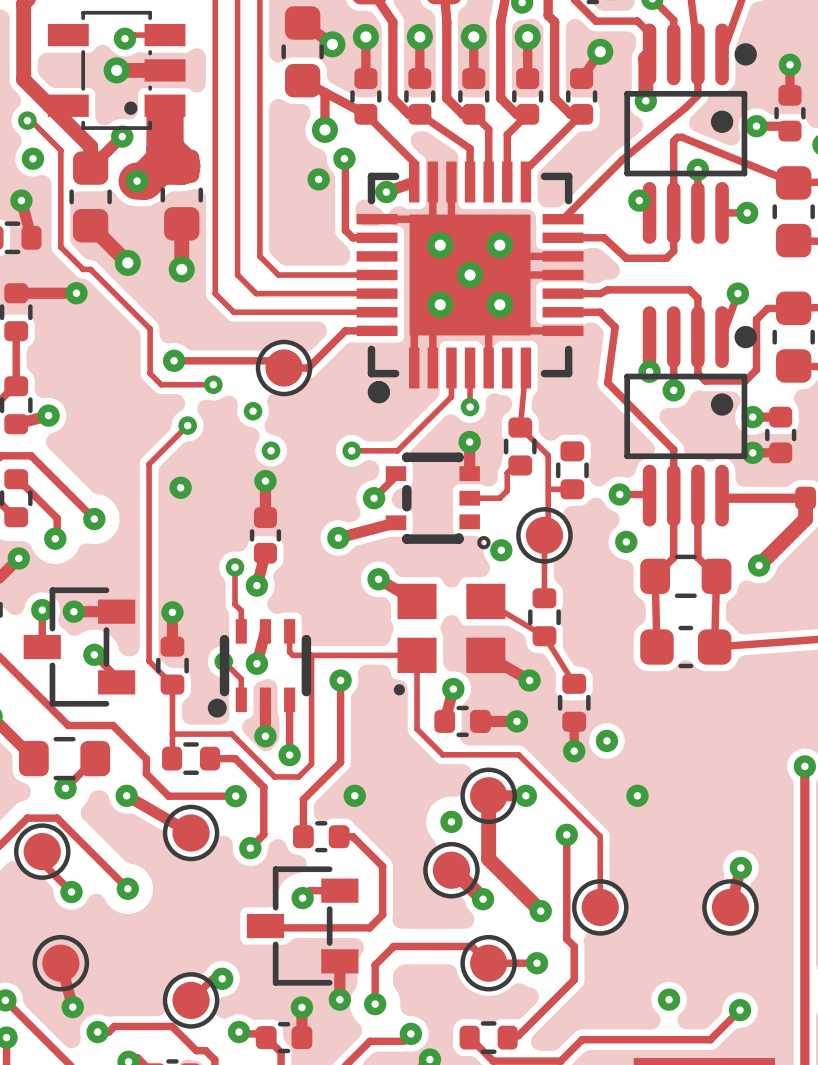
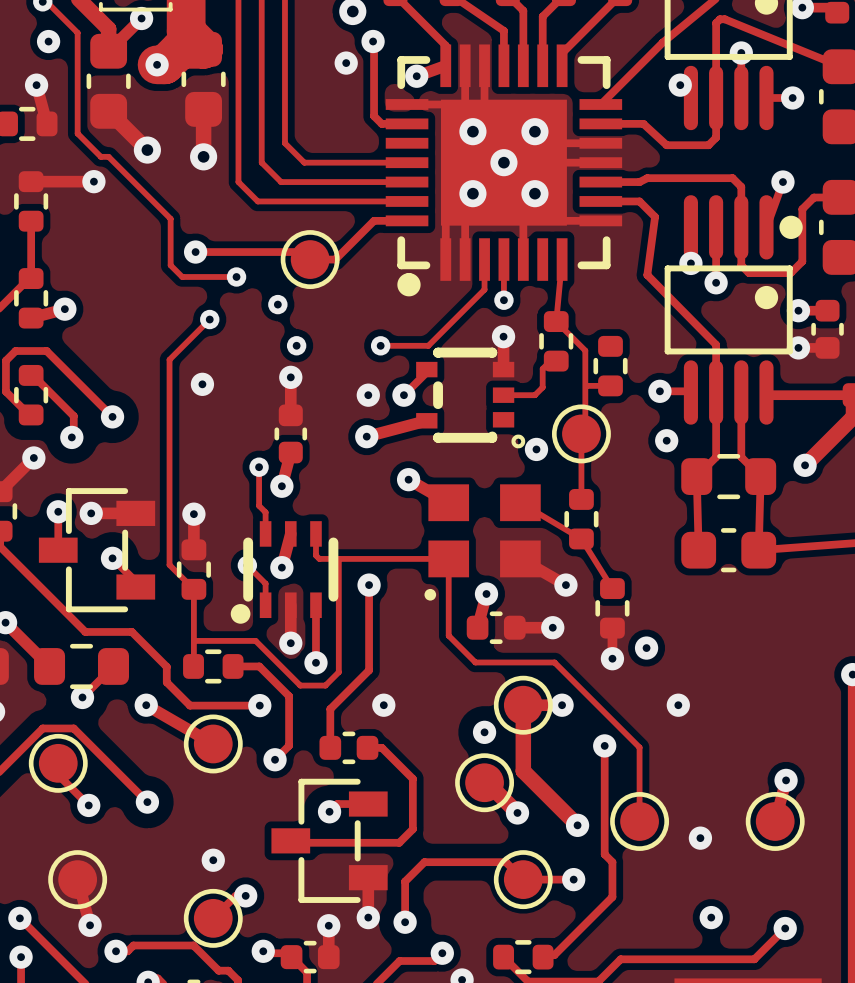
via: none -> (368, 395)
via: none -> (700, 838)
via: none -> (213, 860)

